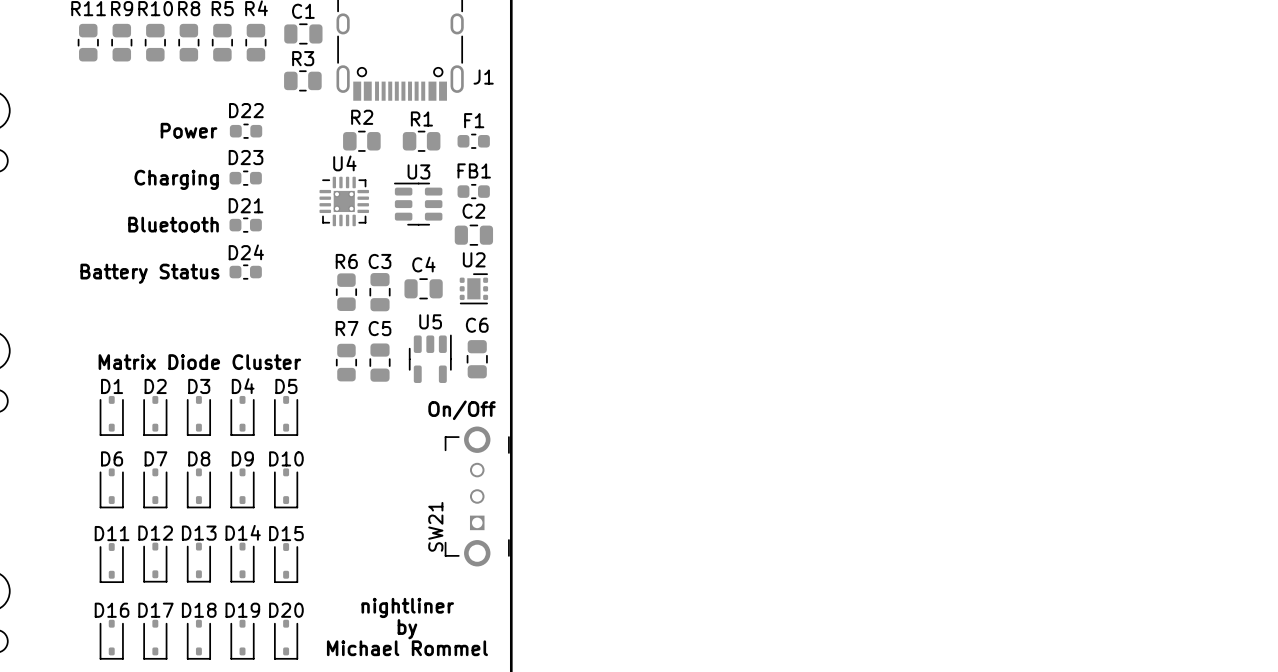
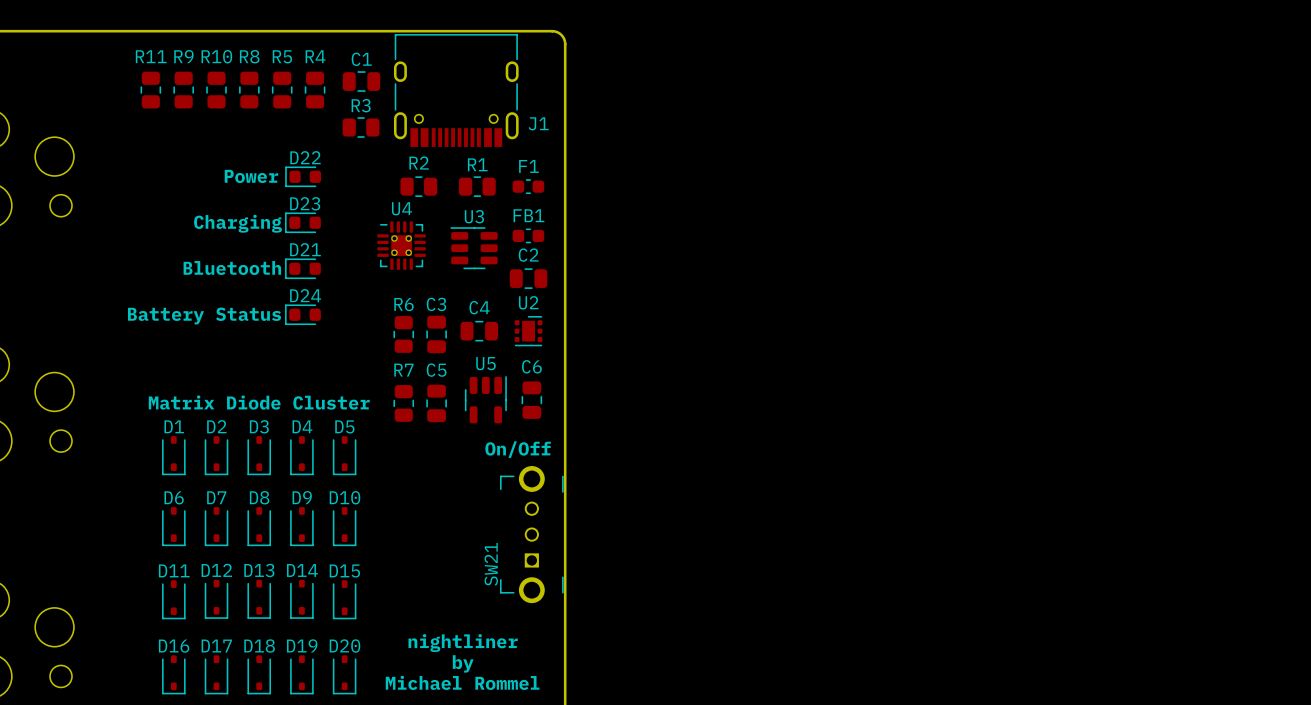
D22 footprint: [229, 123, 263, 139] -> [285, 166, 322, 188]
D23 footprint: [229, 170, 262, 186] -> [285, 212, 321, 234]
D21 footprint: [229, 217, 262, 233] -> [285, 258, 321, 280]
D24 footprint: [229, 264, 262, 280] -> [285, 304, 321, 326]

